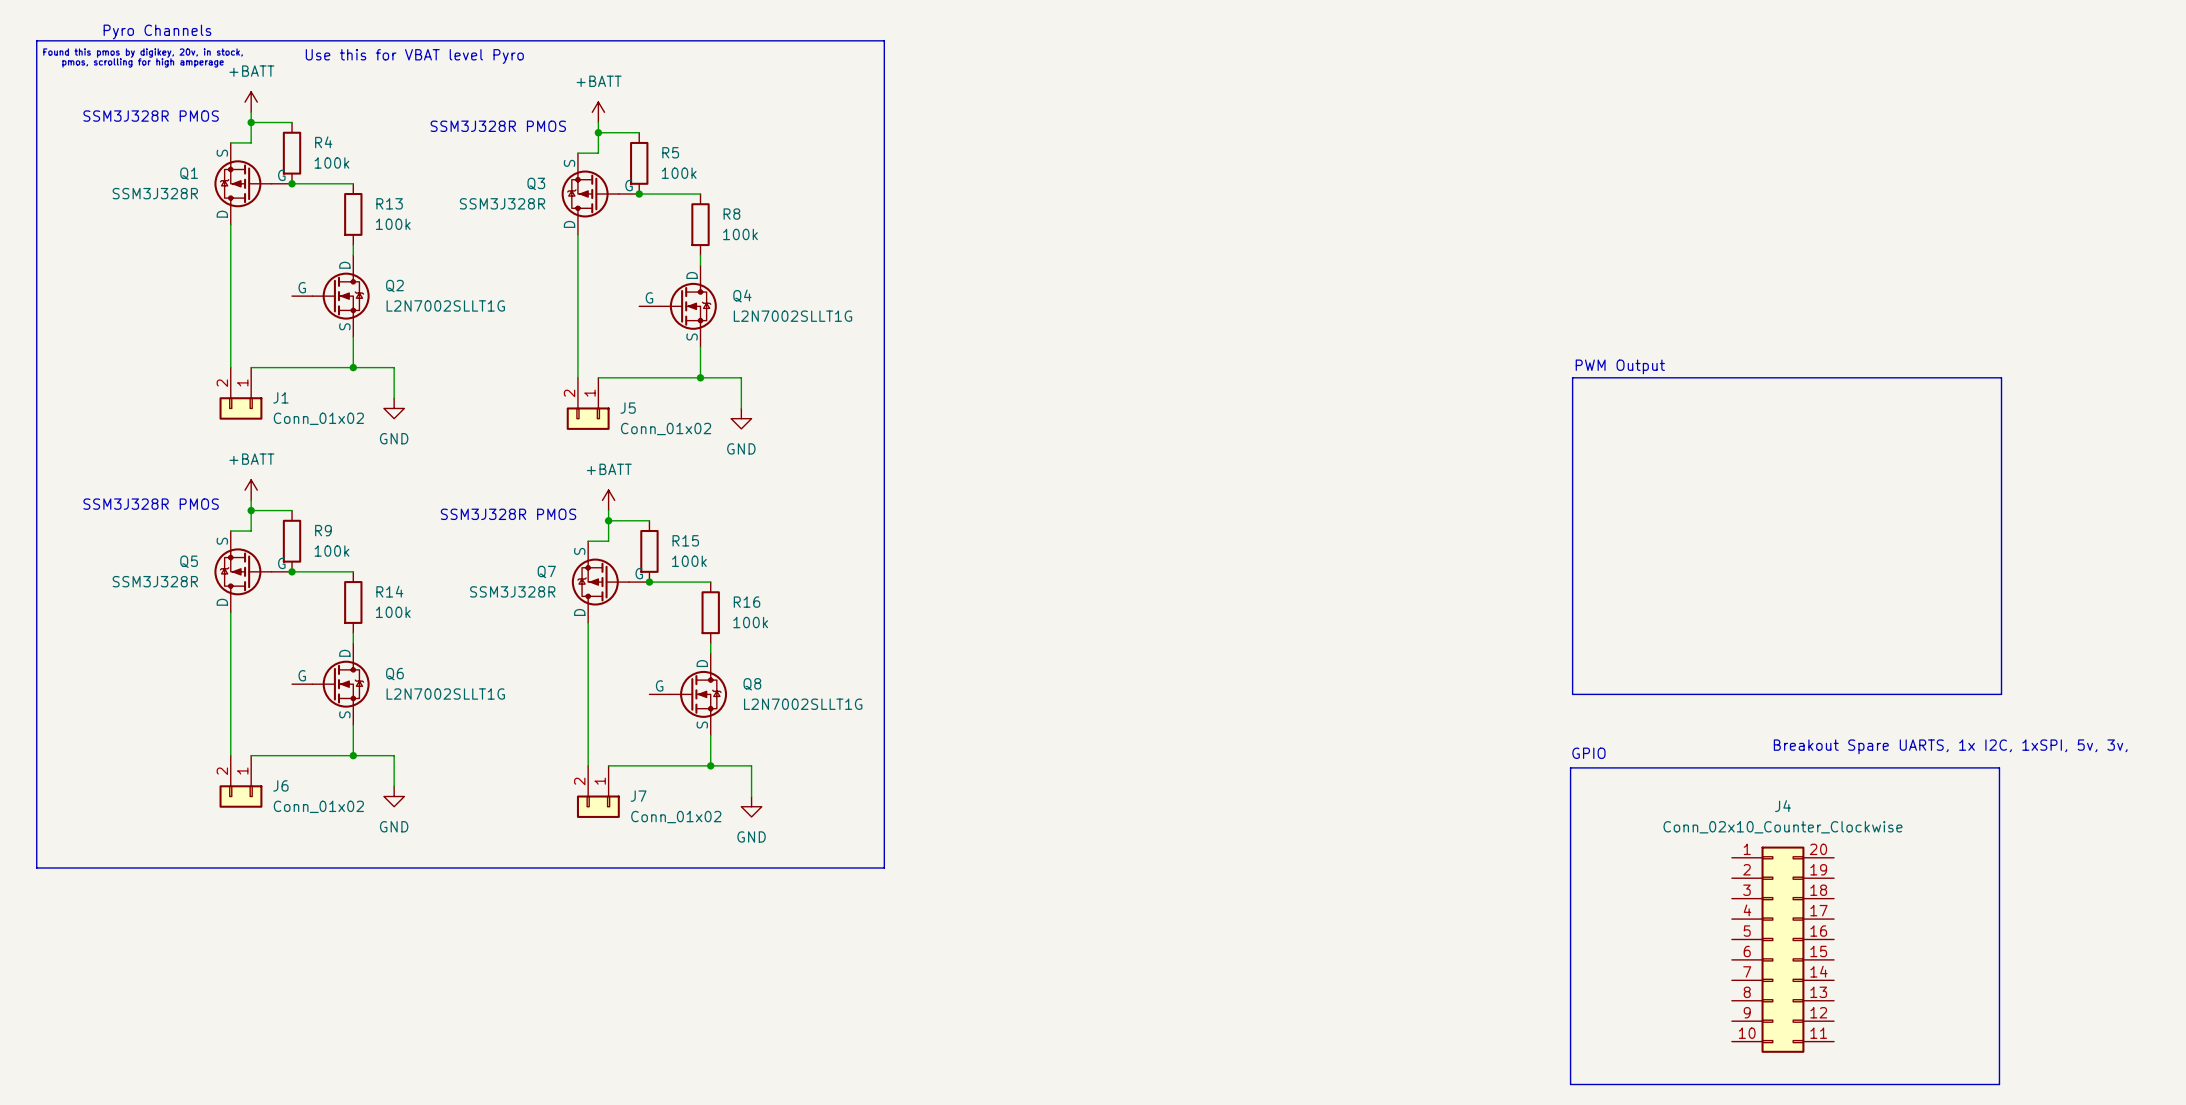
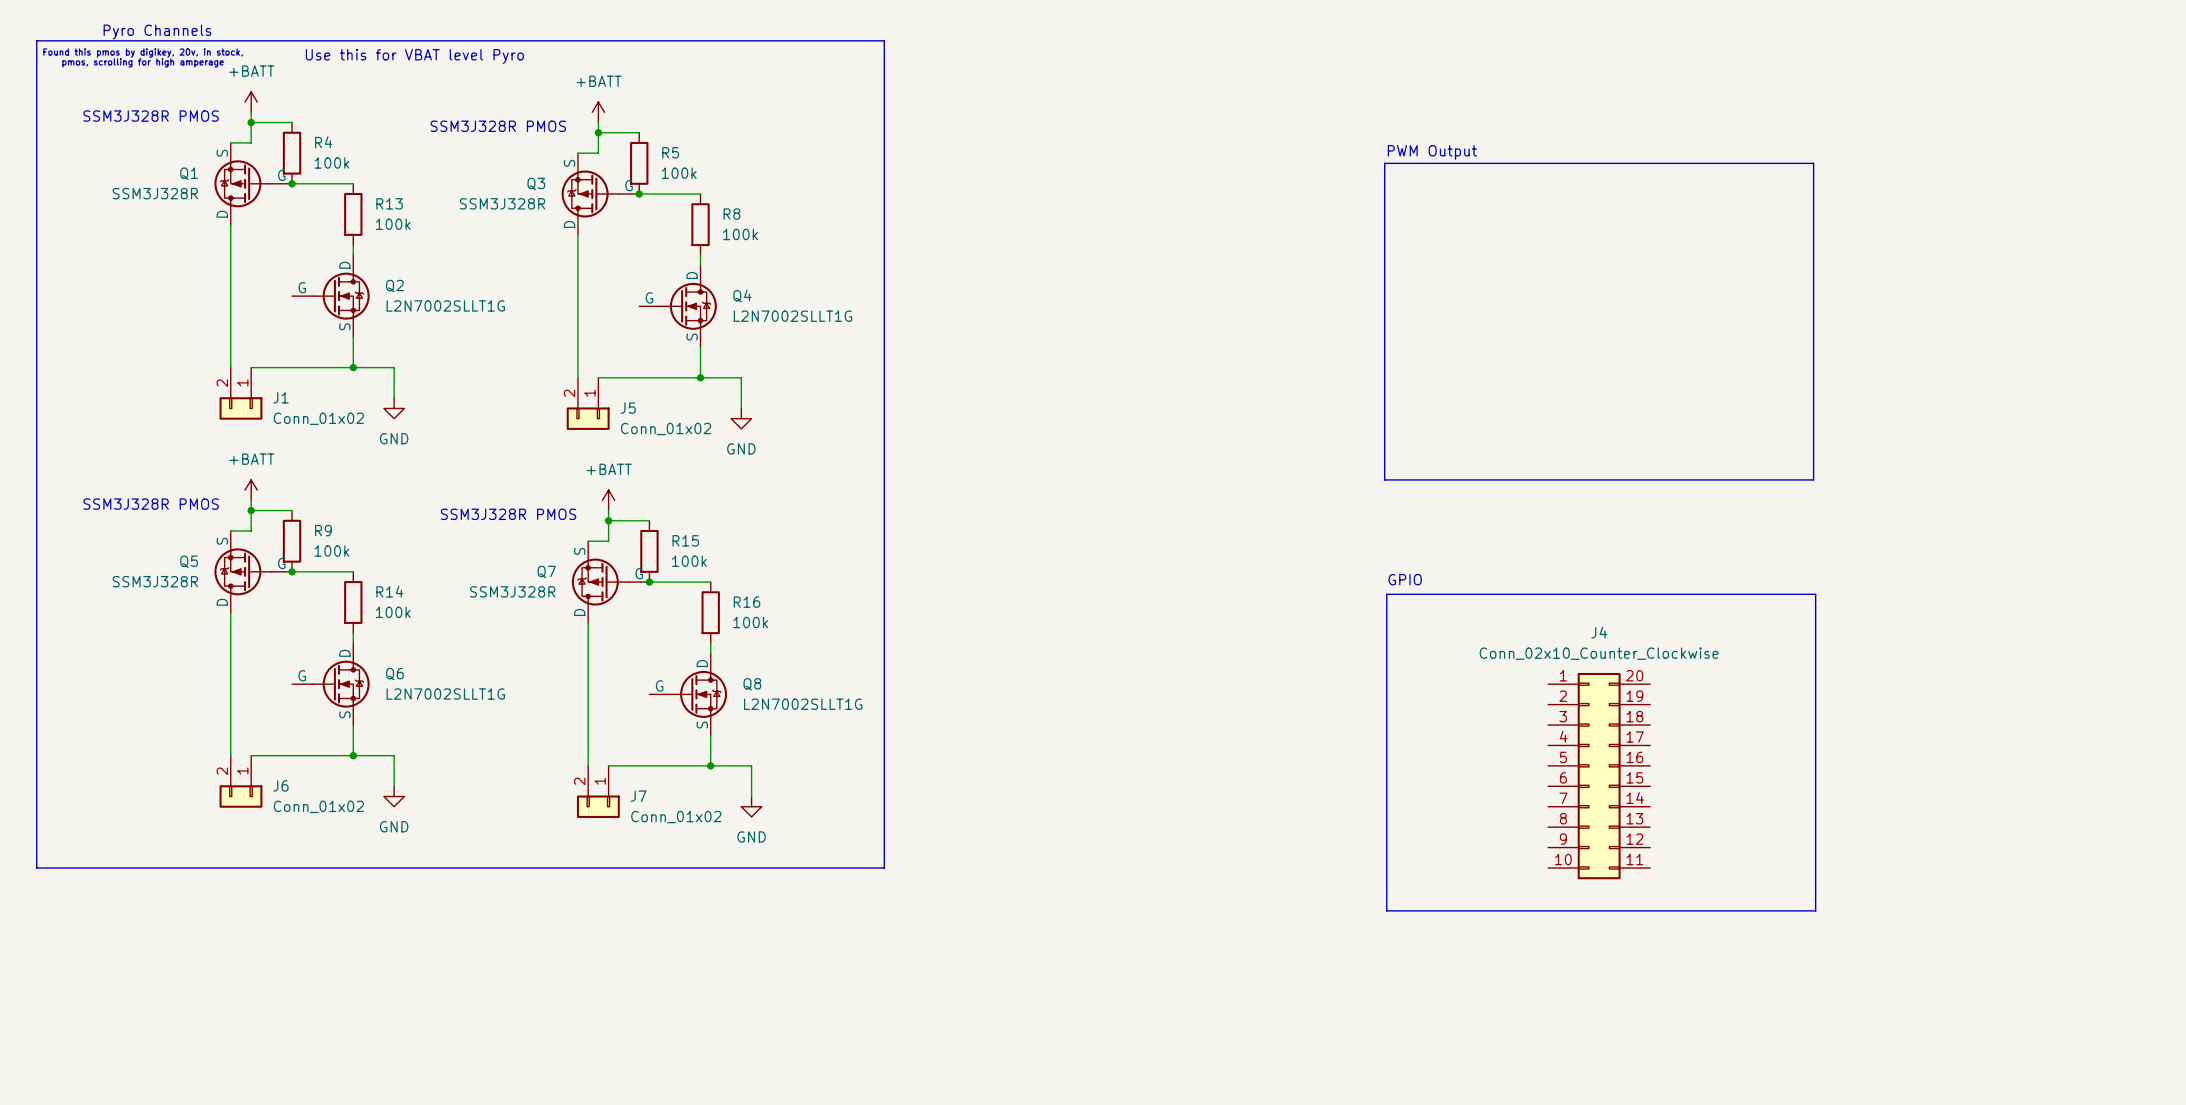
text: none -> PWM Output (1432, 152)
line: none -> (1384, 163) (1813, 163) (1813, 479) (1384, 479) (1384, 163)
text: PWM Output (1620, 366) -> none
line: (1572, 377) (2001, 377) (2001, 694) (1572, 694) (1572, 377) -> none
text: none -> GPIO (1405, 579)
line: none -> (1386, 594) (1815, 594) (1815, 910) (1386, 910) (1386, 594)
text: Breakout Spare UARTS, 1x I2C, 1xSPI, 5v, 3v, (1950, 746) -> none
text: GPIO (1588, 753) -> none
line: (1570, 767) (1999, 767) (1999, 1084) (1570, 1084) (1570, 767) -> none
J4 position: (1782, 949) -> (1599, 776)

